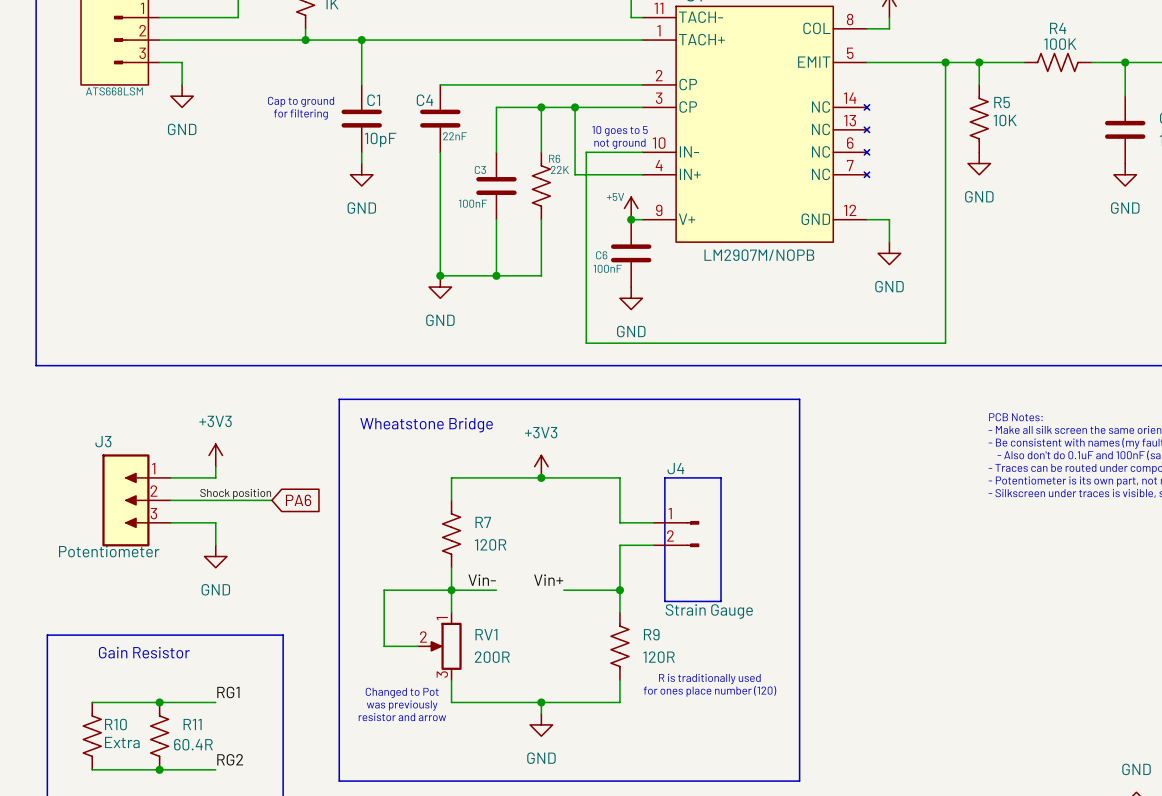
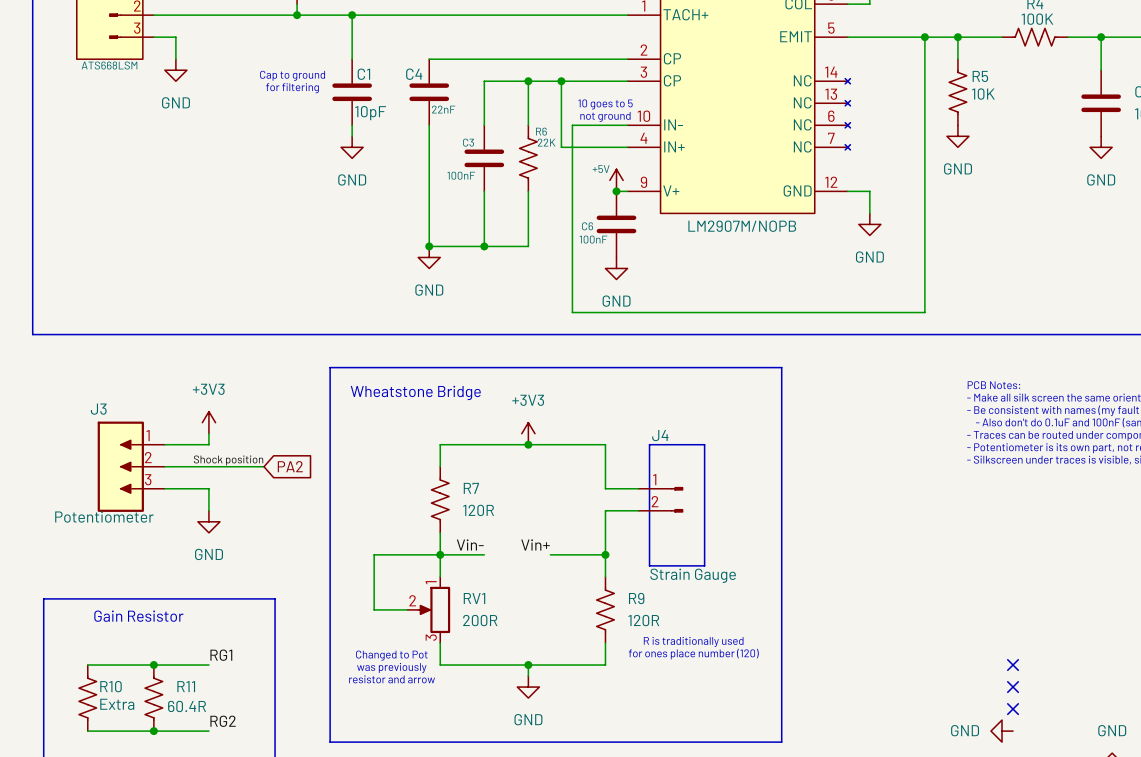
global label: PA6 (298, 500) -> PA2 (290, 466)
no-connect mark: none -> (1013, 665)
no-connect mark: none -> (1013, 687)
no-connect mark: none -> (1013, 709)
power symbol: none -> GND (1002, 731)

